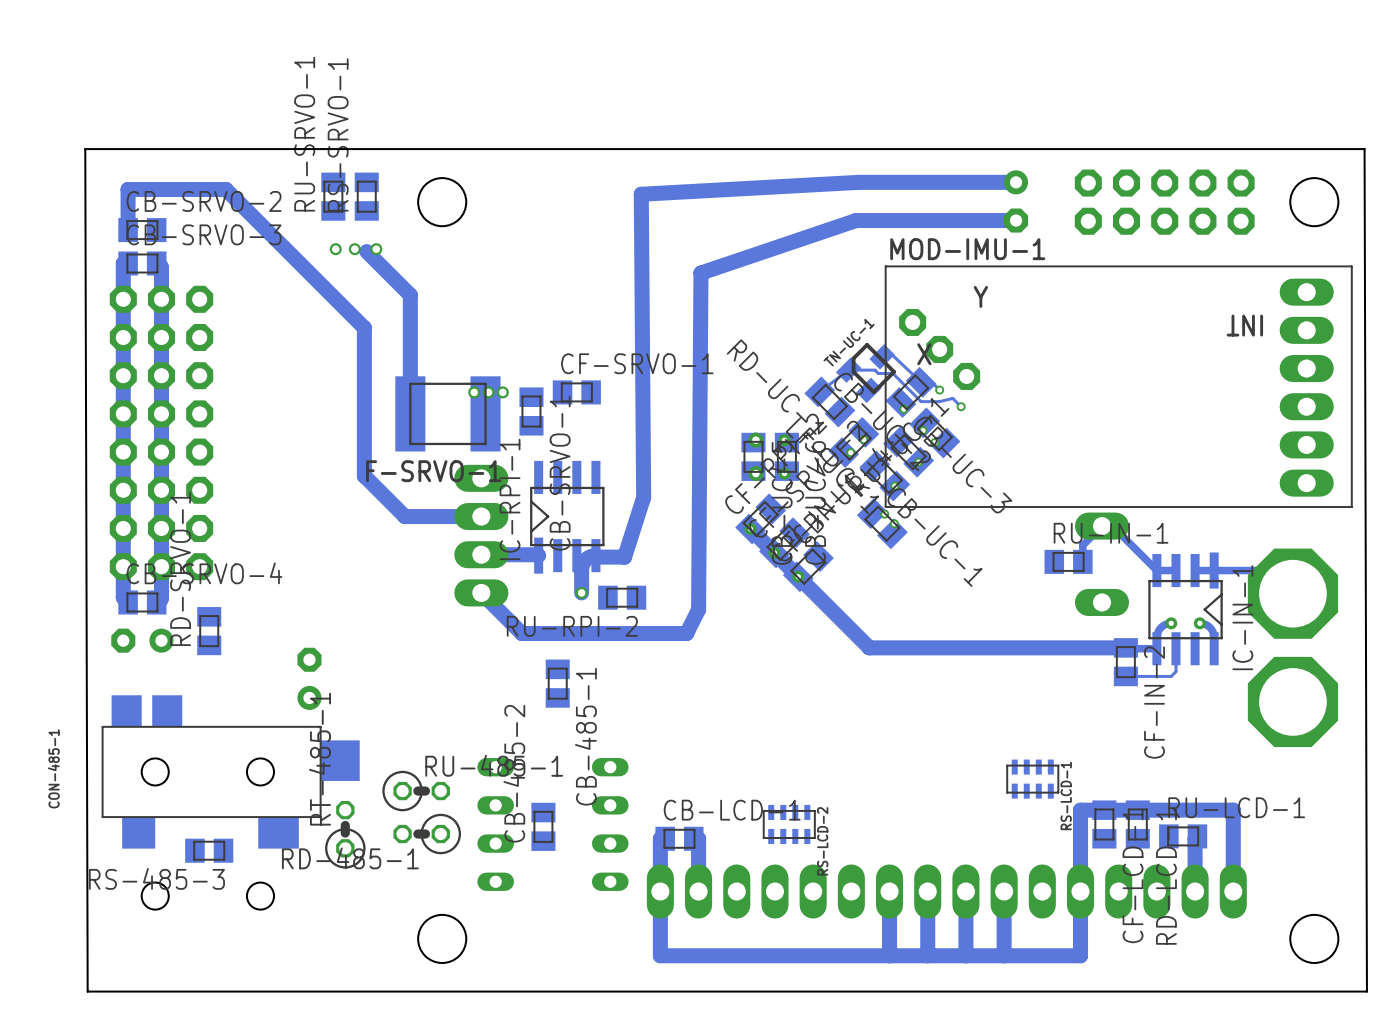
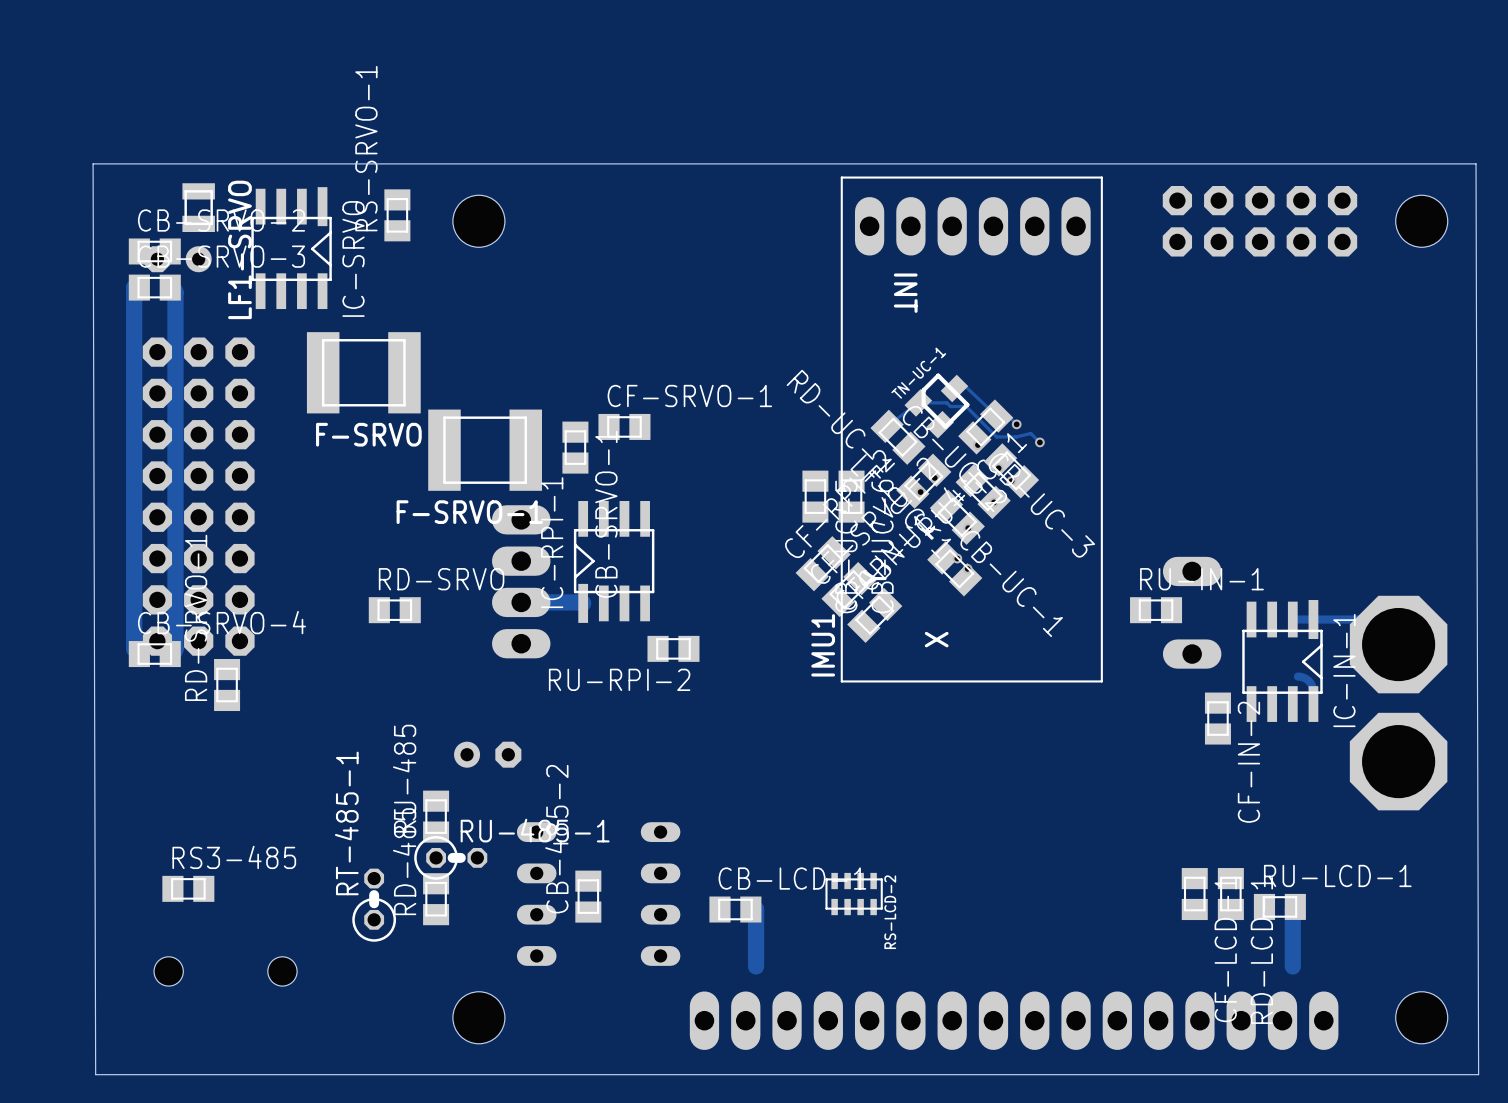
track: (1016, 182) (858, 182) (641, 194) (643, 497) (624, 557) (595, 555) (587, 558) (581, 568) (581, 592) -> none
LF1-SRVO: none -> (198, 207)
RU-SRVO-1: (333, 196) -> none
part: (1016, 201) -> none
track: (1016, 220) (856, 220) (700, 273) (698, 609) (686, 633) (521, 633) (481, 592) -> none
IC-SRVO: none -> (291, 248)
track: (128, 230) (128, 189) (225, 189) (364, 327) (364, 475) (404, 516) (481, 516) -> none
part: none -> (178, 259)
via: (335, 249) -> none
via: (354, 249) -> none
via: (376, 249) -> none
track: (366, 251) (410, 295) (410, 413) -> none
F-SRVO: none -> (363, 372)
part: (939, 349) -> none
MOD-IMU-1: (1118, 386) -> none
via: (474, 392) -> none
via: (488, 392) -> none
via: (502, 392) -> none
IMU1: none -> (971, 429)
part position: (161, 432) -> (198, 496)
via: (755, 440) -> none
via: (784, 440) -> none
via: (755, 473) -> none
via: (784, 473) -> none
track: (750, 529) (869, 647) (1156, 648) (1158, 630) (1164, 625) (1171, 623) -> none
via: (750, 529) -> none
via: (774, 552) -> none
RD-SRVO: none -> (394, 610)
track: (1082, 561) (1082, 545) (1101, 526) (1112, 526) (1156, 570) (1175, 570) -> none
via: (798, 576) -> none
via: (581, 592) -> none
via: (1171, 623) -> none
via: (1199, 623) -> none
part: (142, 640) -> none
track: (1175, 648) (1175, 671) (1171, 676) (1125, 676) -> none
part rotation: 0° (309, 678) -> 90° clockwise (487, 754)
part position: (309, 678) -> (487, 754)
CB-485-1: (557, 683) -> none
RU-485: none -> (436, 816)
CON-485-1: (230, 771) -> none
RS-LCD-1: (1032, 779) -> none
RS3-485: none -> (188, 888)
RD-485: none -> (436, 899)
RD-485-1: (427, 834) -> none
track: (665, 838) (660, 838) (660, 955) (1080, 955) (1080, 810) (1233, 810) (1233, 891) -> none
RS-485-3: (209, 850) -> none
track: (889, 891) (889, 955) -> none
track: (927, 891) (927, 955) -> none
part position: (946, 891) -> (1014, 1020)
track: (965, 891) (965, 955) -> none
track: (1004, 891) (1004, 955) -> none

